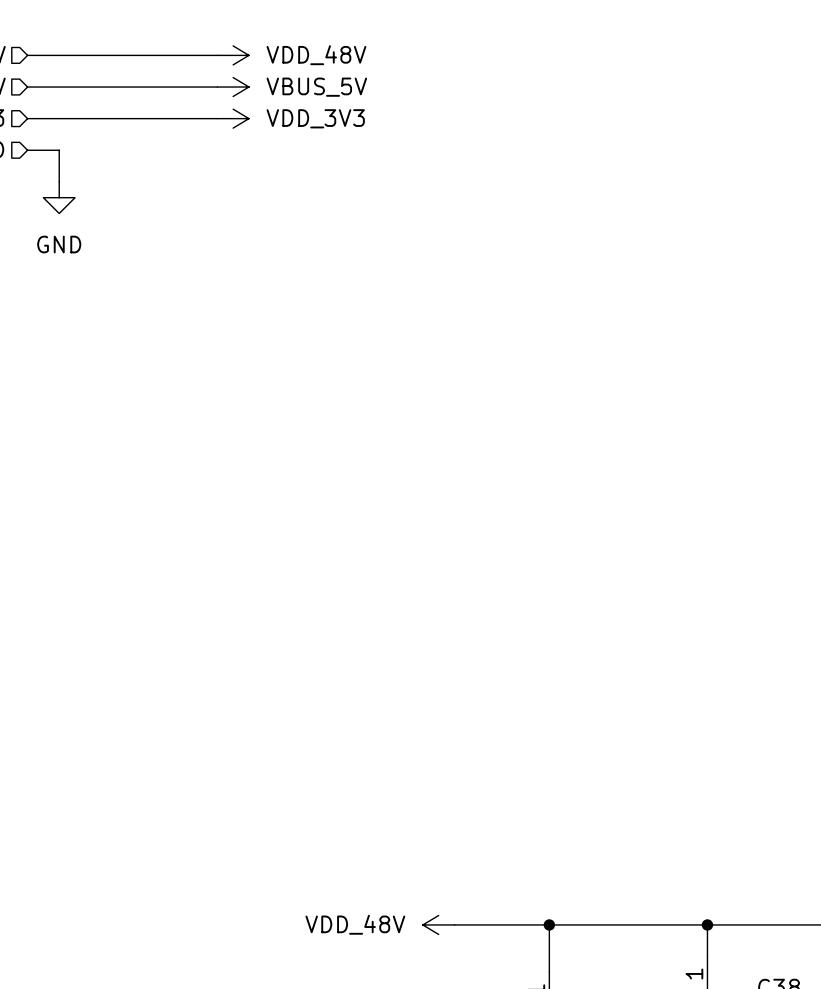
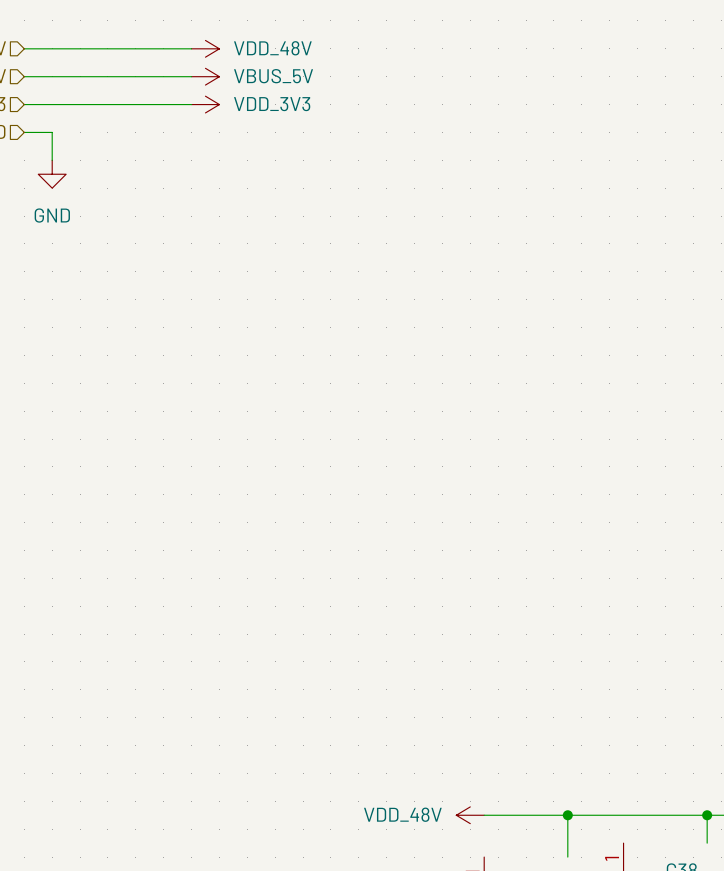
power symbol position: VDD_48V (438, 924) -> VDD_48V (470, 815)
wire: (454, 924) (549, 924) (549, 972) -> none
junction: (549, 924) -> none
wire: none -> (567, 815) (567, 857)
junction: none -> (567, 815)
wire: (707, 924) (707, 956) -> (707, 815) (707, 843)
junction: (707, 924) -> none
junction: none -> (707, 815)

